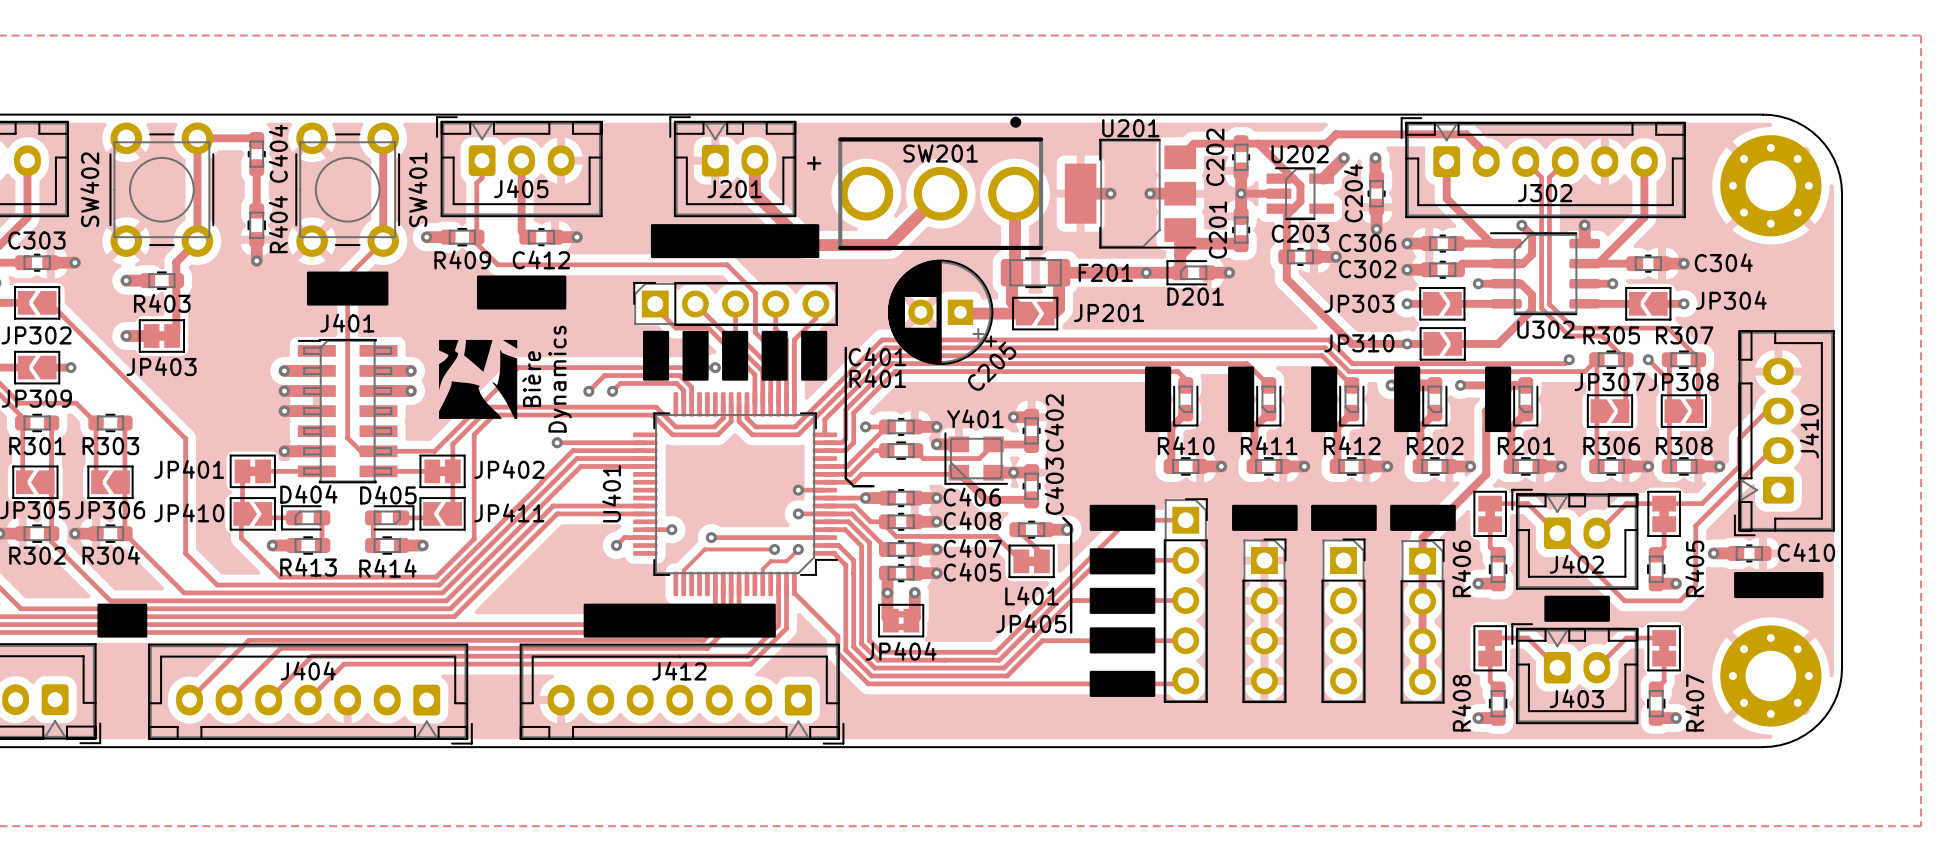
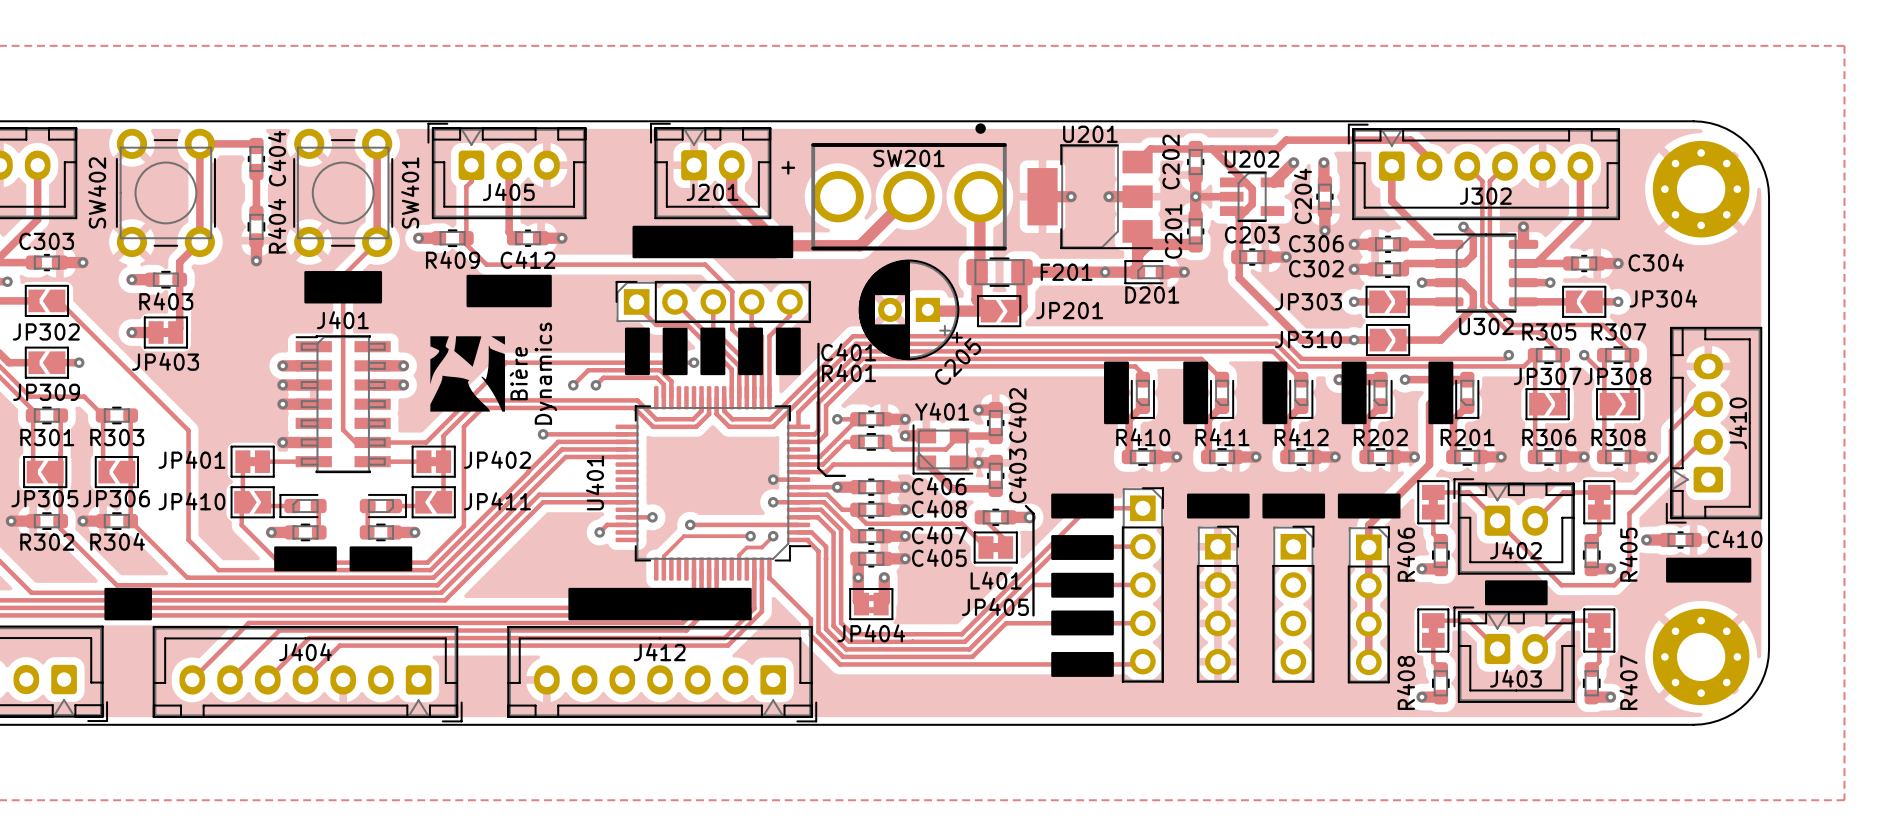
D404 name: D404 (308, 494) -> none
D405 name: D405 (388, 495) -> none
drawing: none -> [274, 546, 413, 572]
R413 name: R413 (308, 567) -> none
R414 name: R414 (387, 568) -> none

